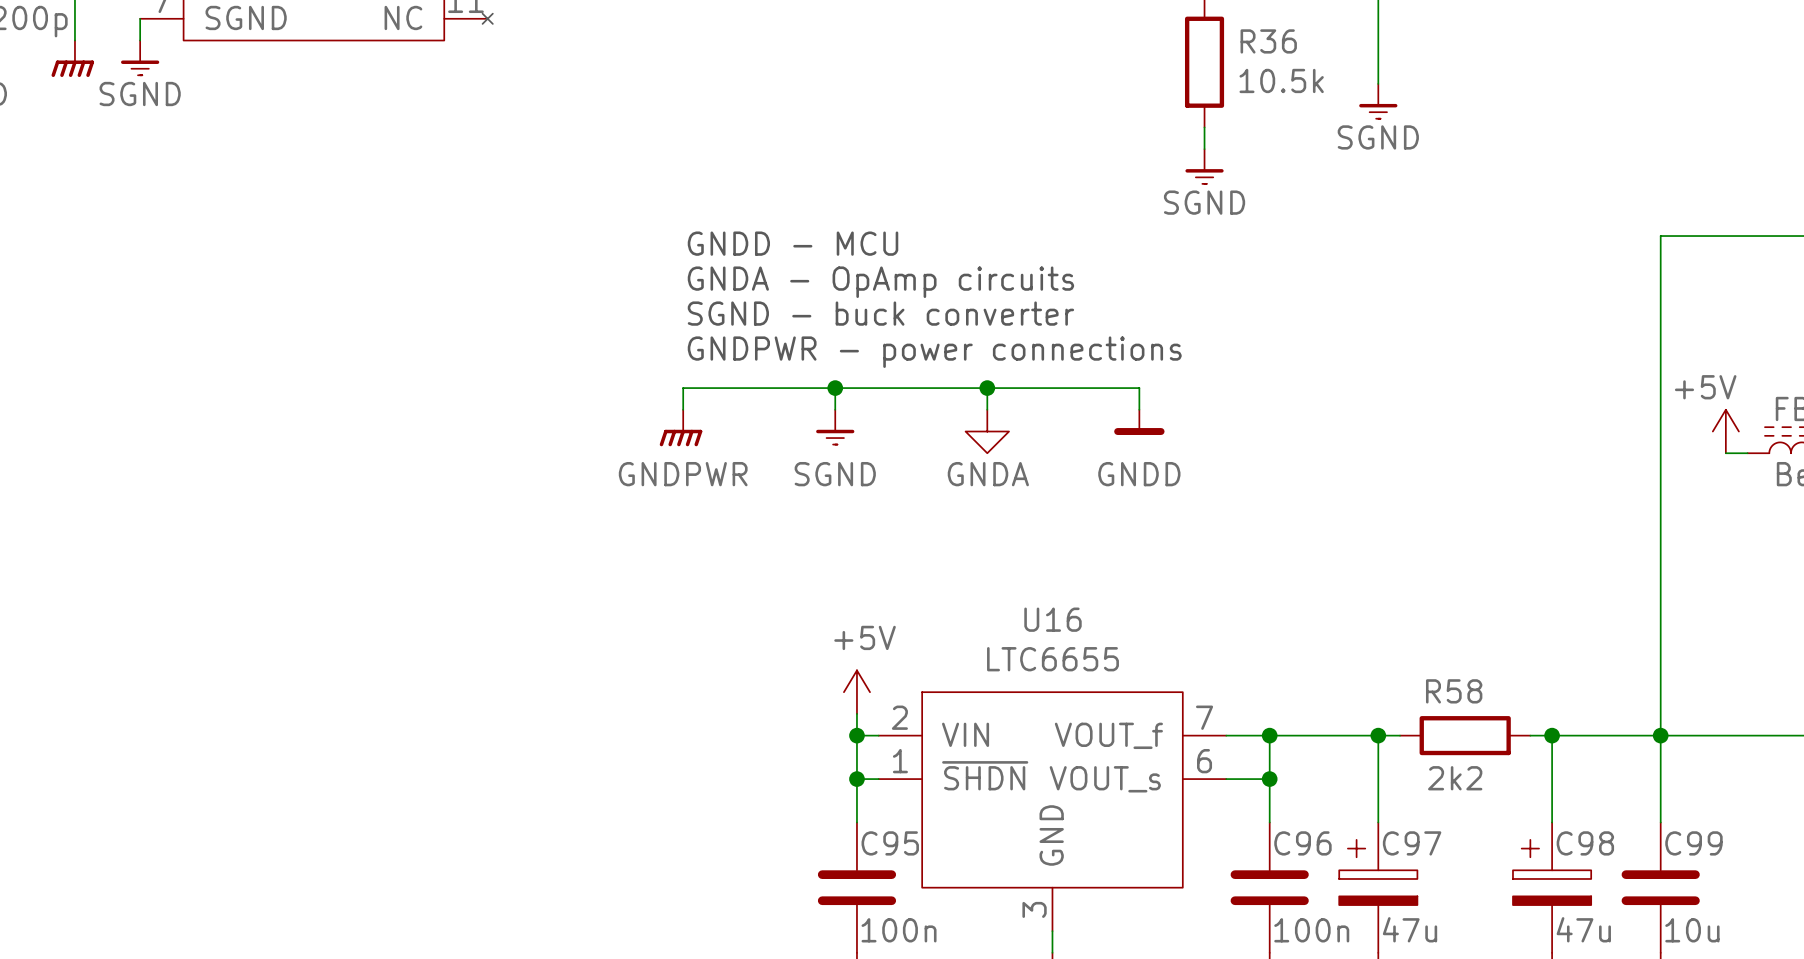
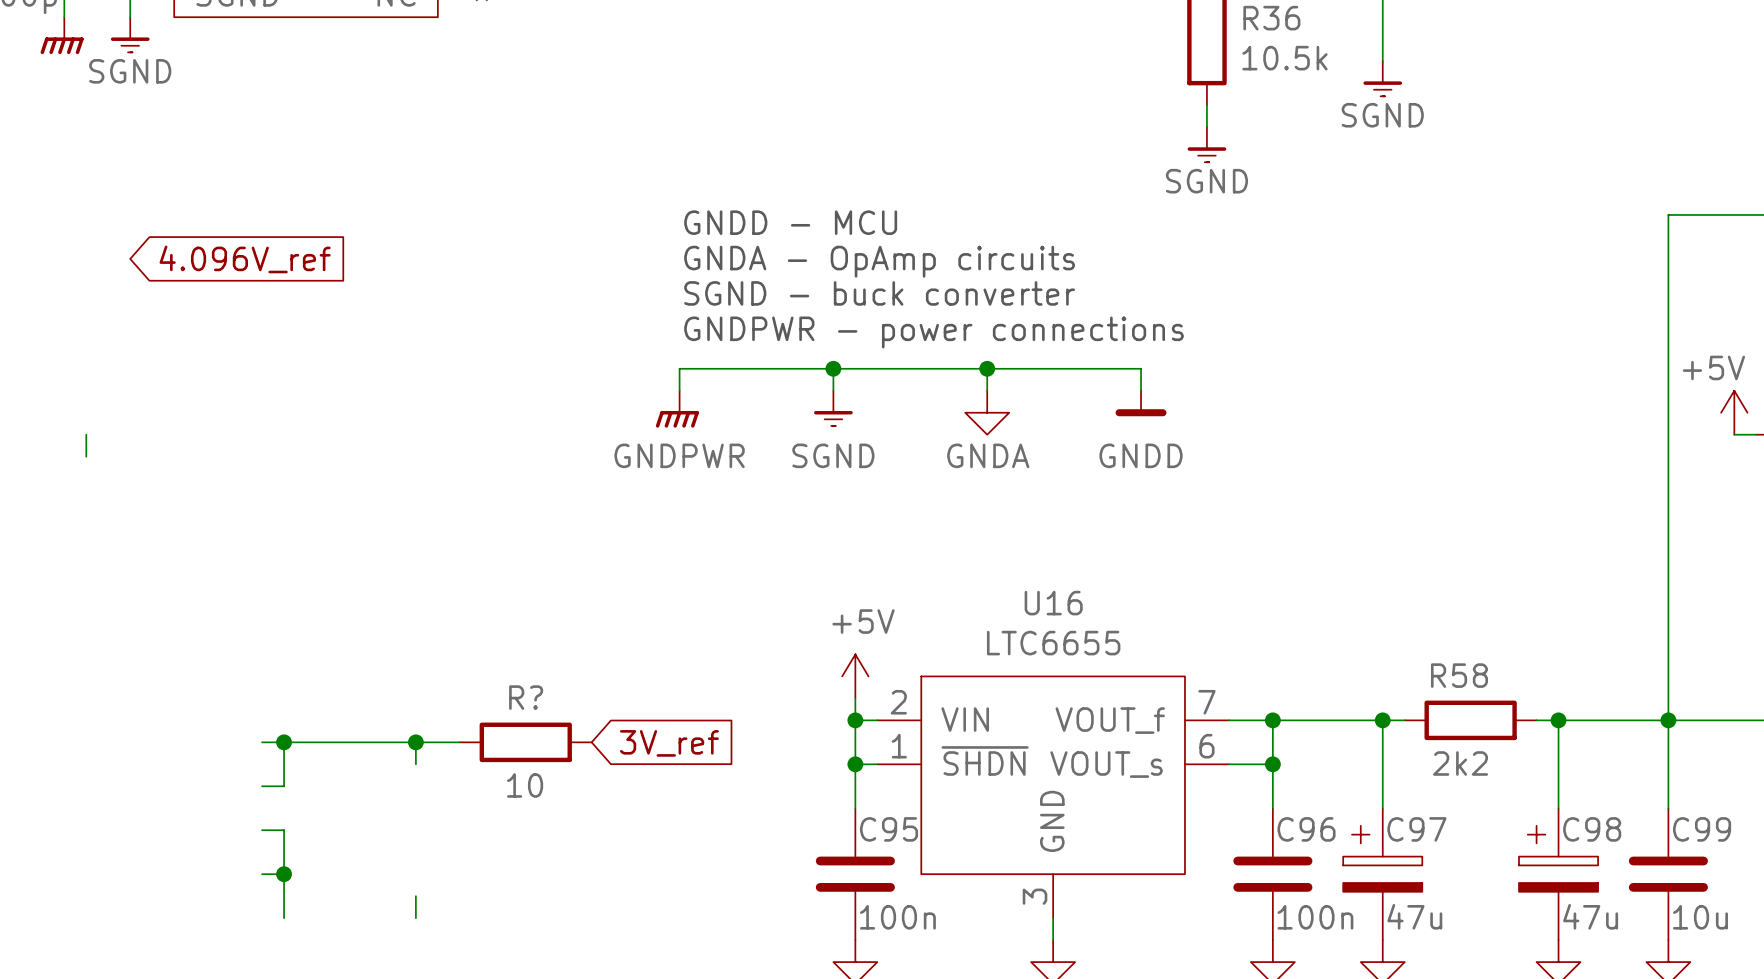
global label: none -> 4.096V_ref (245, 259)
wire: none -> (86, 434) (86, 456)
wire: none -> (262, 742) (459, 742)
wire: none -> (284, 742) (284, 786) (262, 786)
junction: none -> (284, 742)
wire: none -> (415, 742) (415, 764)
junction: none -> (415, 742)
R?: none -> 10 (525, 742)
global label: none -> 3V_ref (669, 743)
wire: none -> (262, 830) (284, 830) (284, 918)
wire: none -> (262, 874) (284, 874)
junction: none -> (284, 874)
wire: none -> (415, 896) (415, 918)

